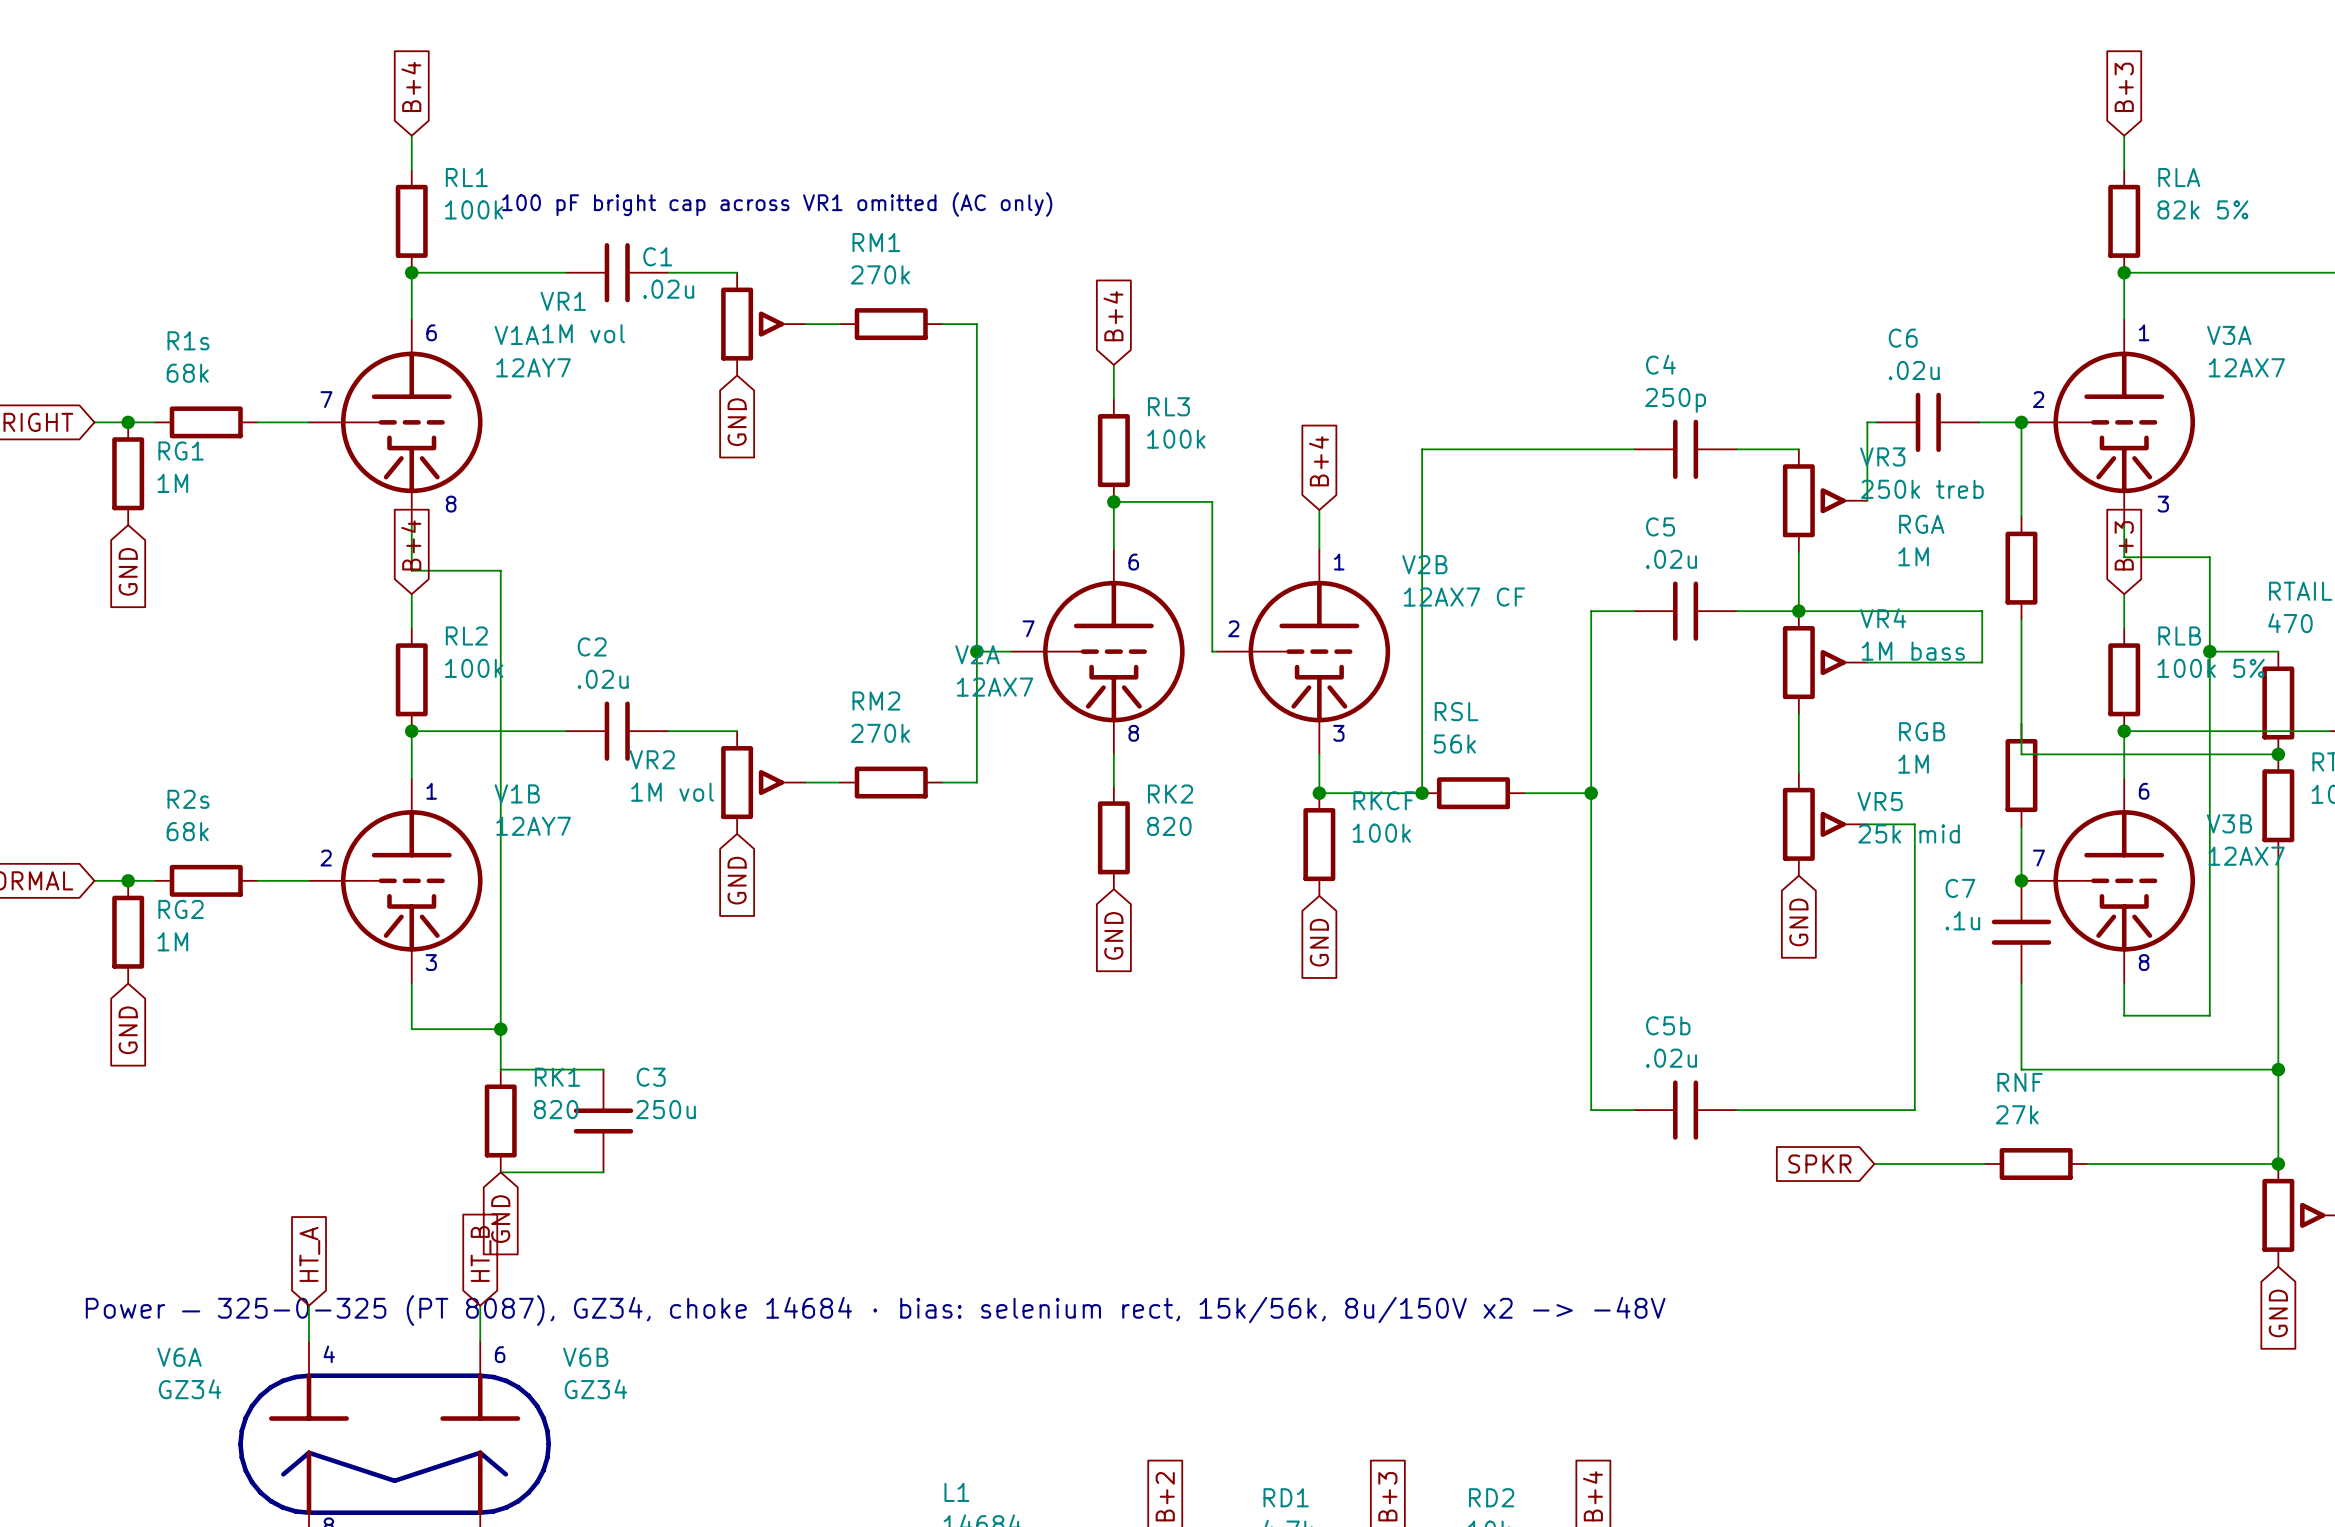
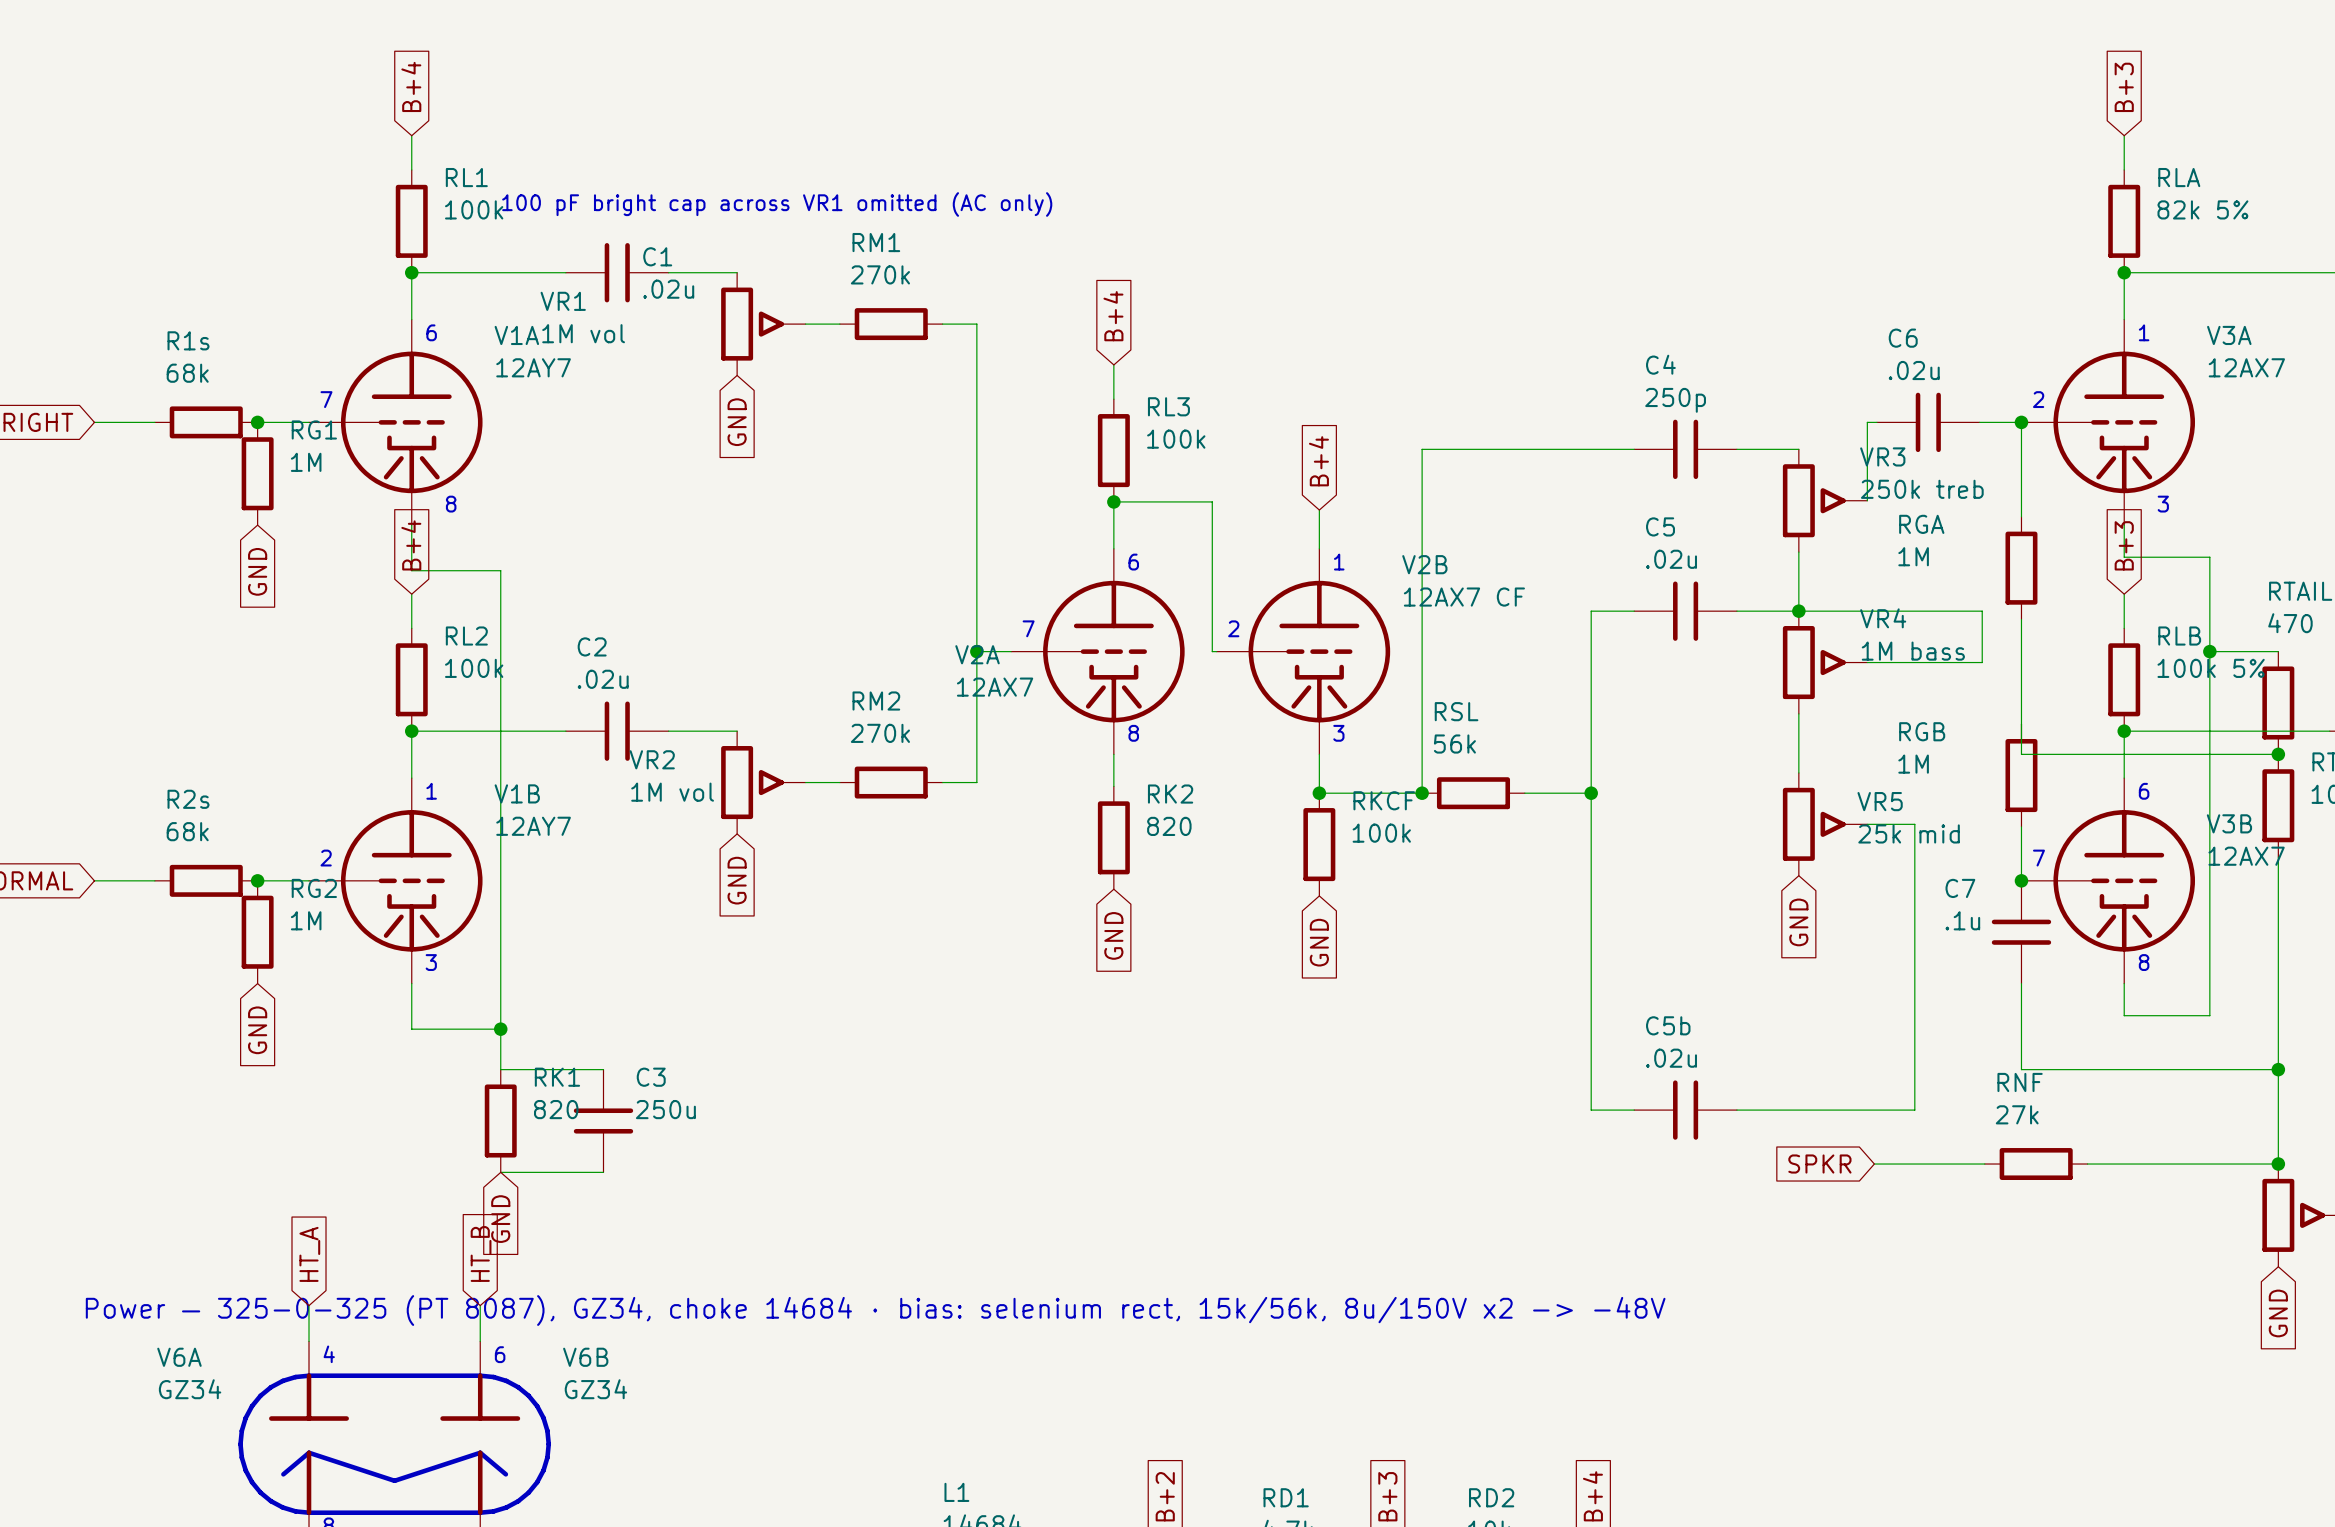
junction: (128, 422) -> none
junction: none -> (257, 422)
RG1 name position: RG1 (181, 451) -> RG1 (314, 429)
RG1 position: (128, 473) -> (257, 473)
RG1 value position: 1M (172, 483) -> 1M (306, 462)
global label position: GND (128, 571) -> GND (257, 571)
junction: (128, 880) -> none
junction: none -> (257, 880)
RG2 name position: RG2 (181, 909) -> RG2 (314, 888)
RG2 position: (128, 932) -> (257, 932)
RG2 value position: 1M (172, 941) -> 1M (306, 920)
global label position: GND (128, 1030) -> GND (257, 1030)

